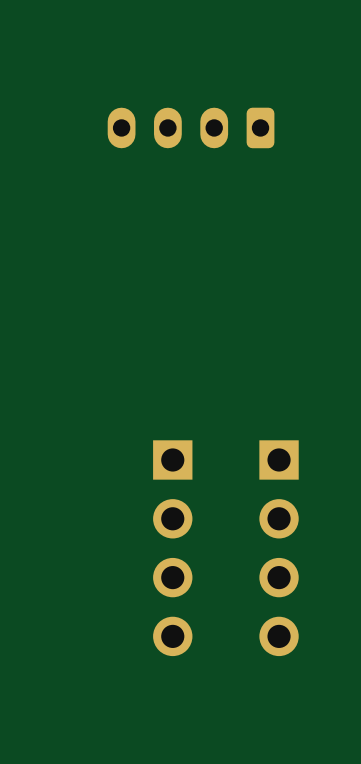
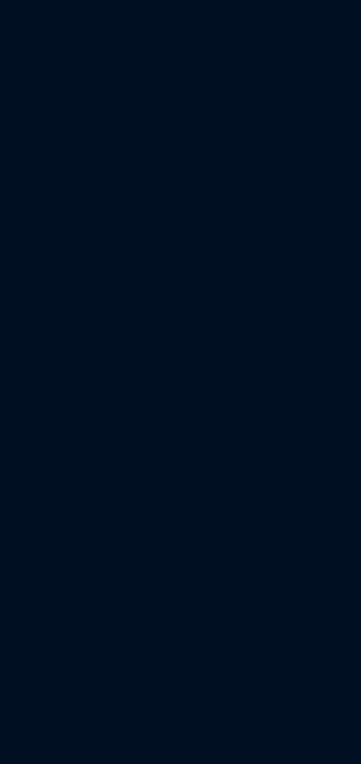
part: (191, 127) -> none
part: (172, 548) -> none
part: (279, 548) -> none

